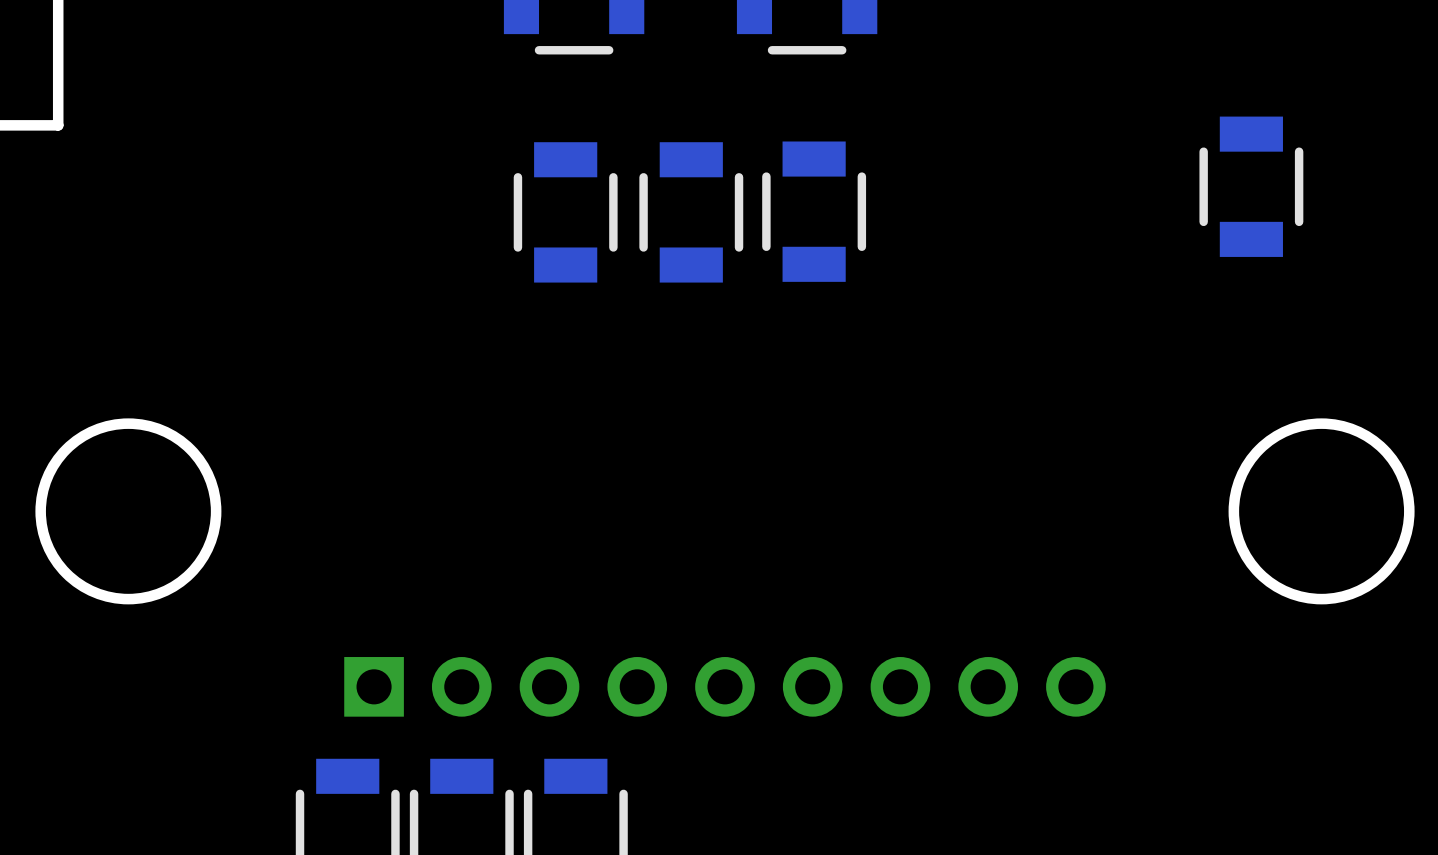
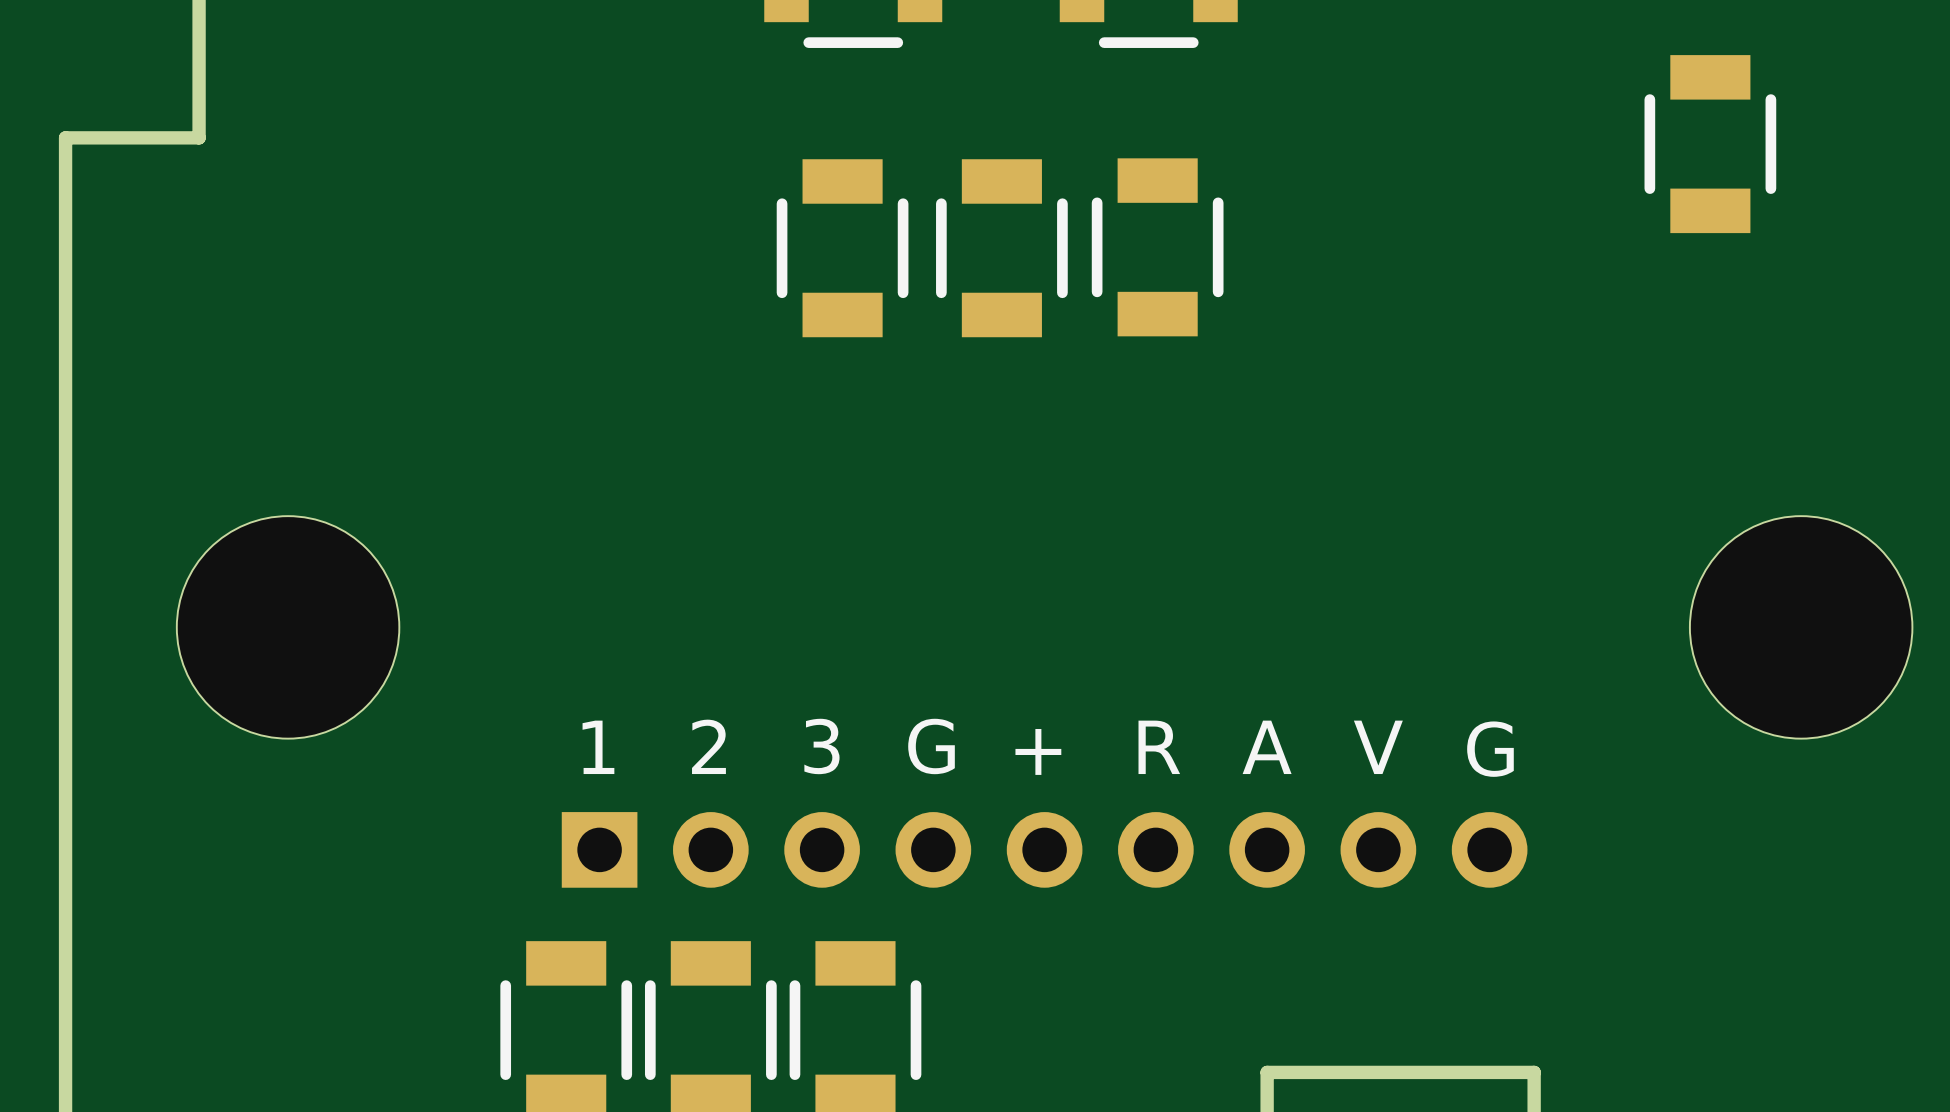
part position: (1251, 186) -> (1710, 144)
round board edge: [35, 418, 222, 605] -> none
round board edge: [1228, 418, 1415, 605] -> none
part: none -> (288, 627)
part: none -> (1801, 627)
text: none -> 1 (598, 747)
text: none -> 2 (708, 746)
text: none -> 3 (821, 746)
text: none -> G (931, 746)
text: none -> R (1159, 747)
text: none -> A (1267, 747)
text: none -> V (1378, 747)
text: none -> G (1490, 749)
text: none -> + (1038, 751)

